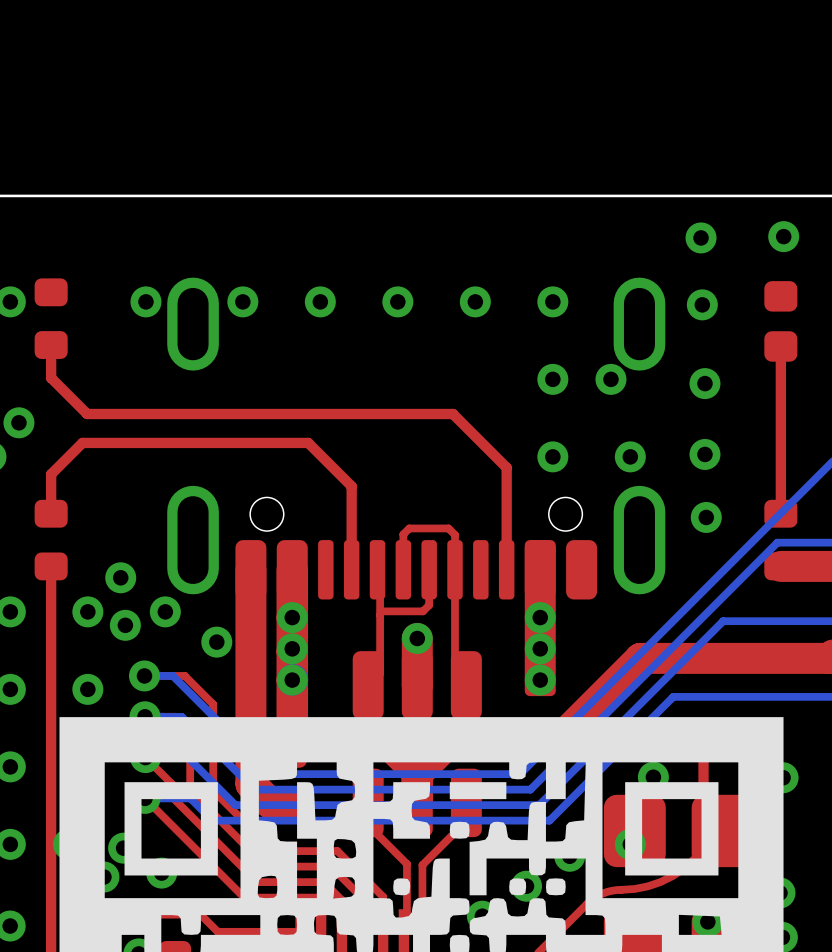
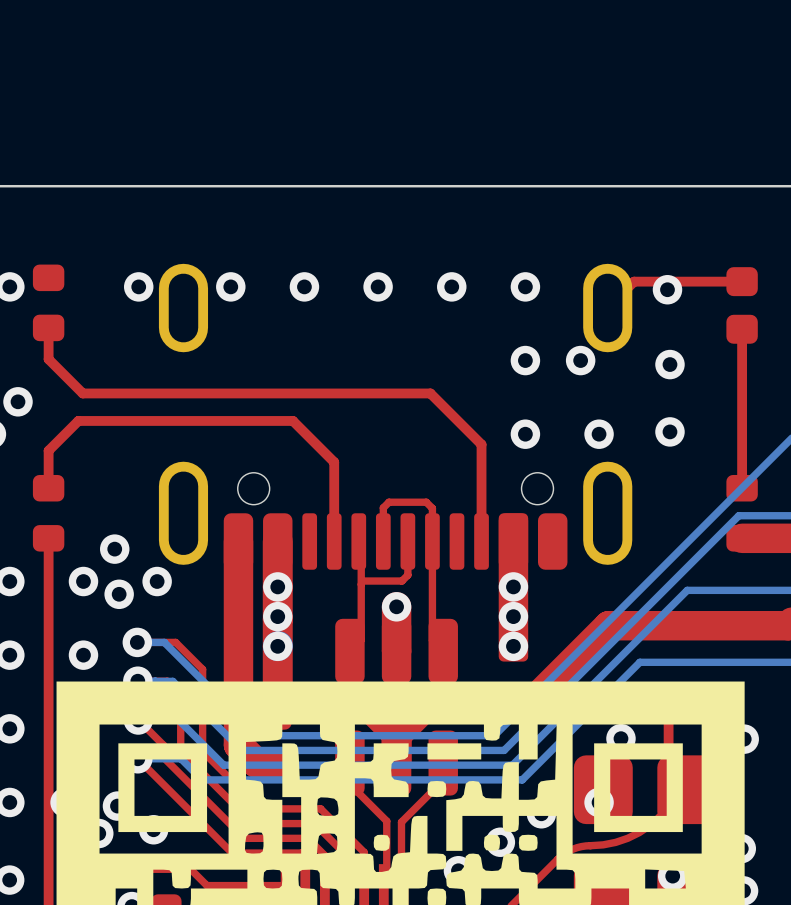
via: (783, 236) -> none
via: (701, 237) -> none
top track: none -> (742, 281) (634, 281) (607, 308)
via: (706, 517) -> none
via: (216, 642) -> none

